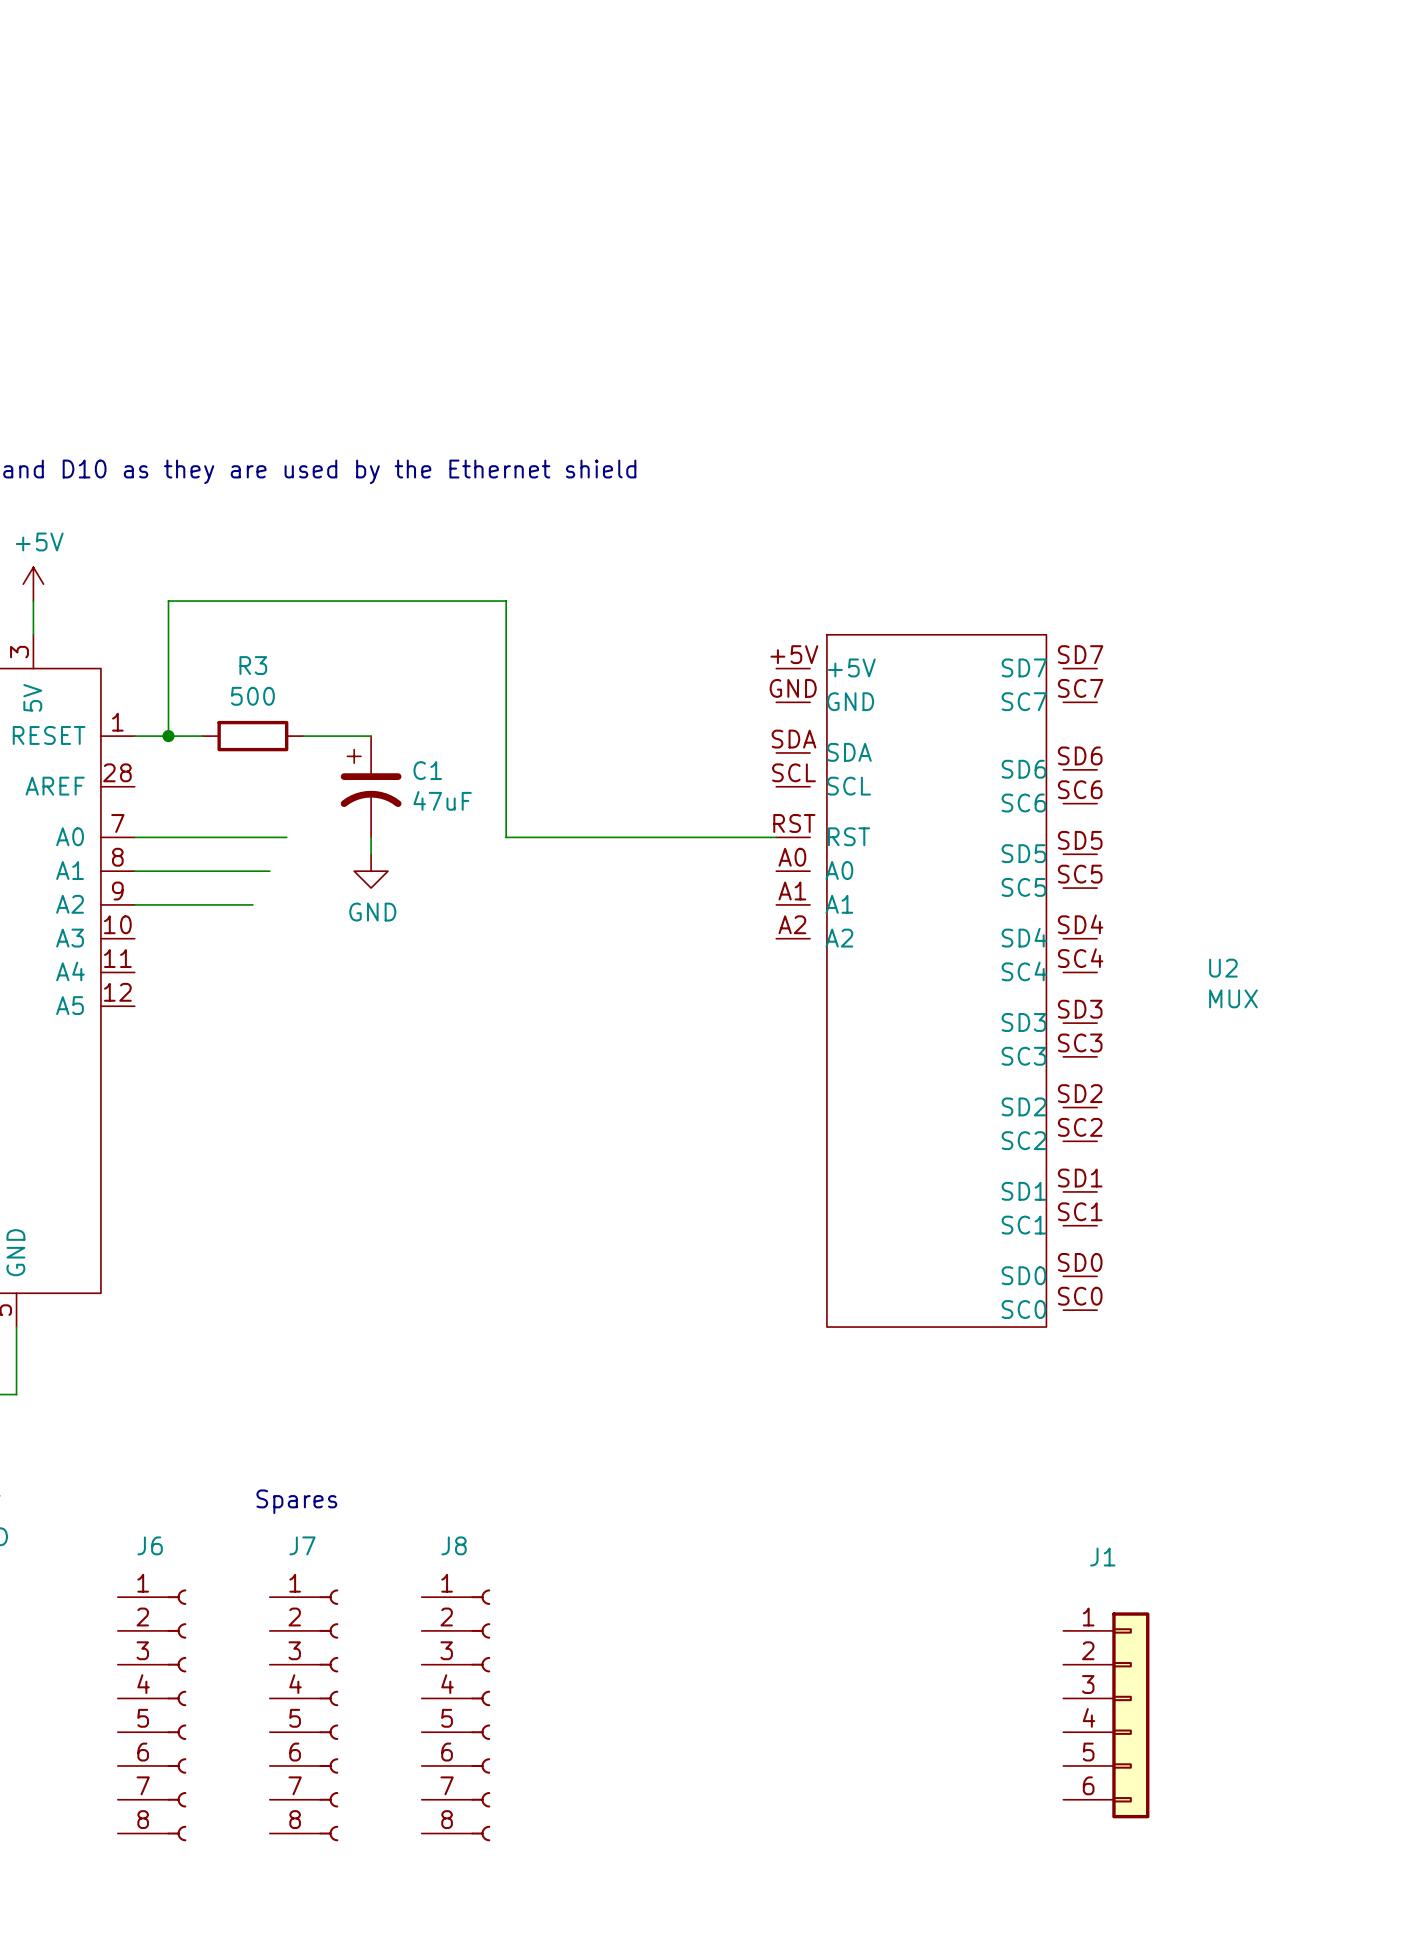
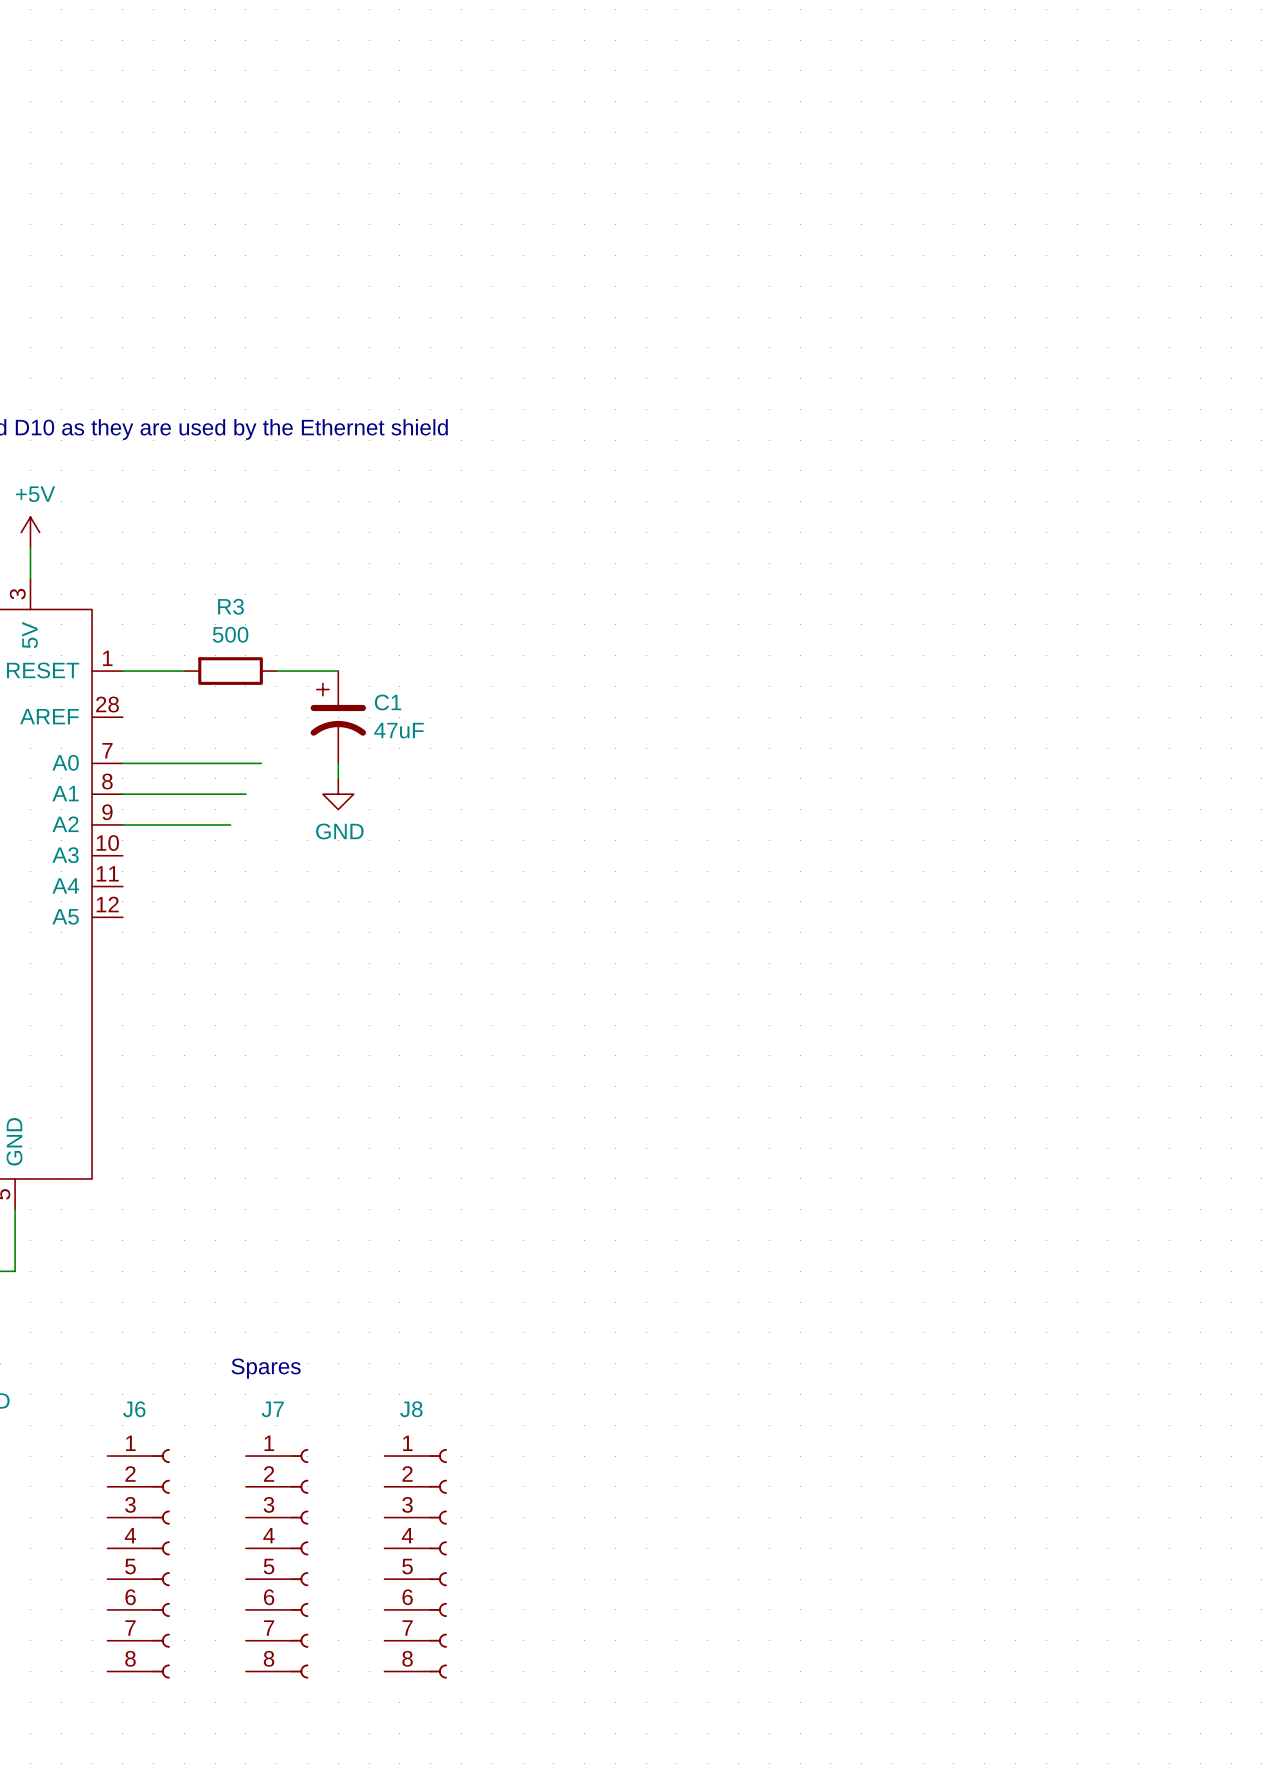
wire: (168, 736) (168, 601) (506, 601) (506, 837) (776, 837) -> none
junction: (168, 736) -> none
U2: MUX (936, 980) -> none
J1: (1106, 1715) -> none

